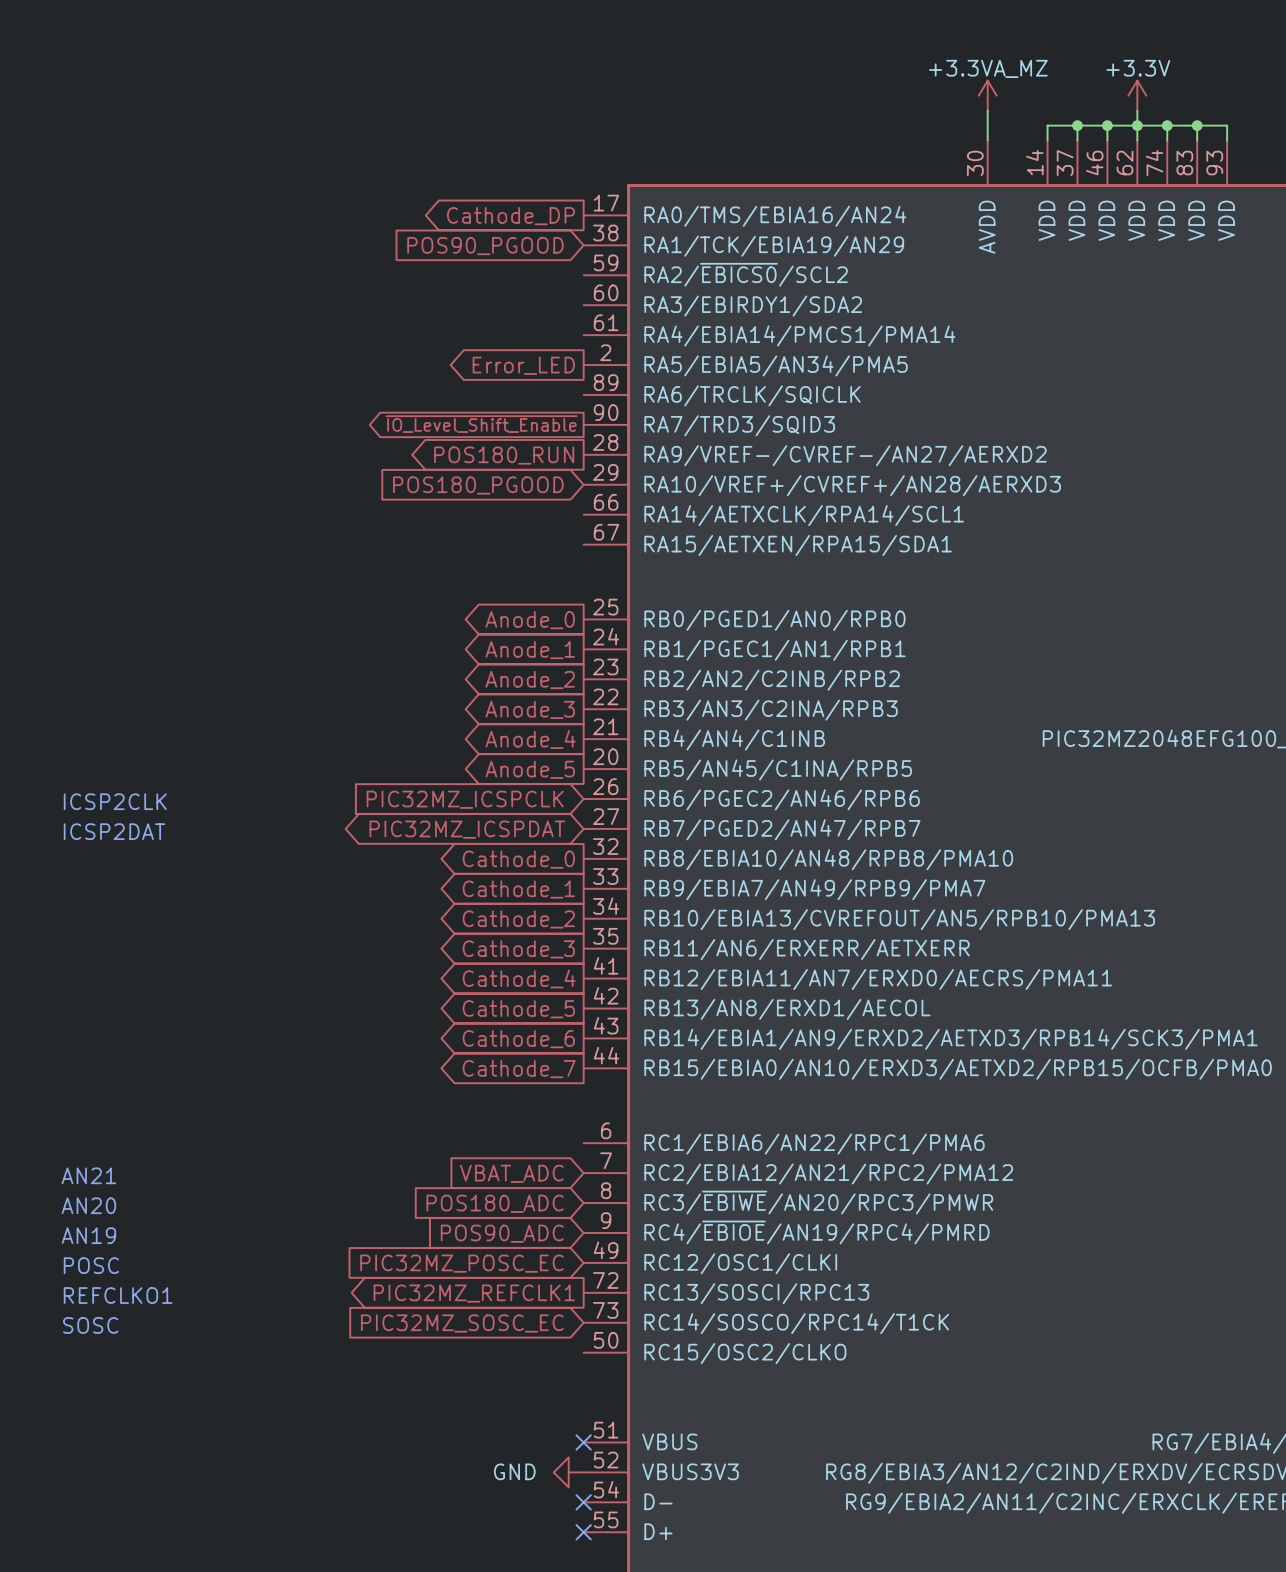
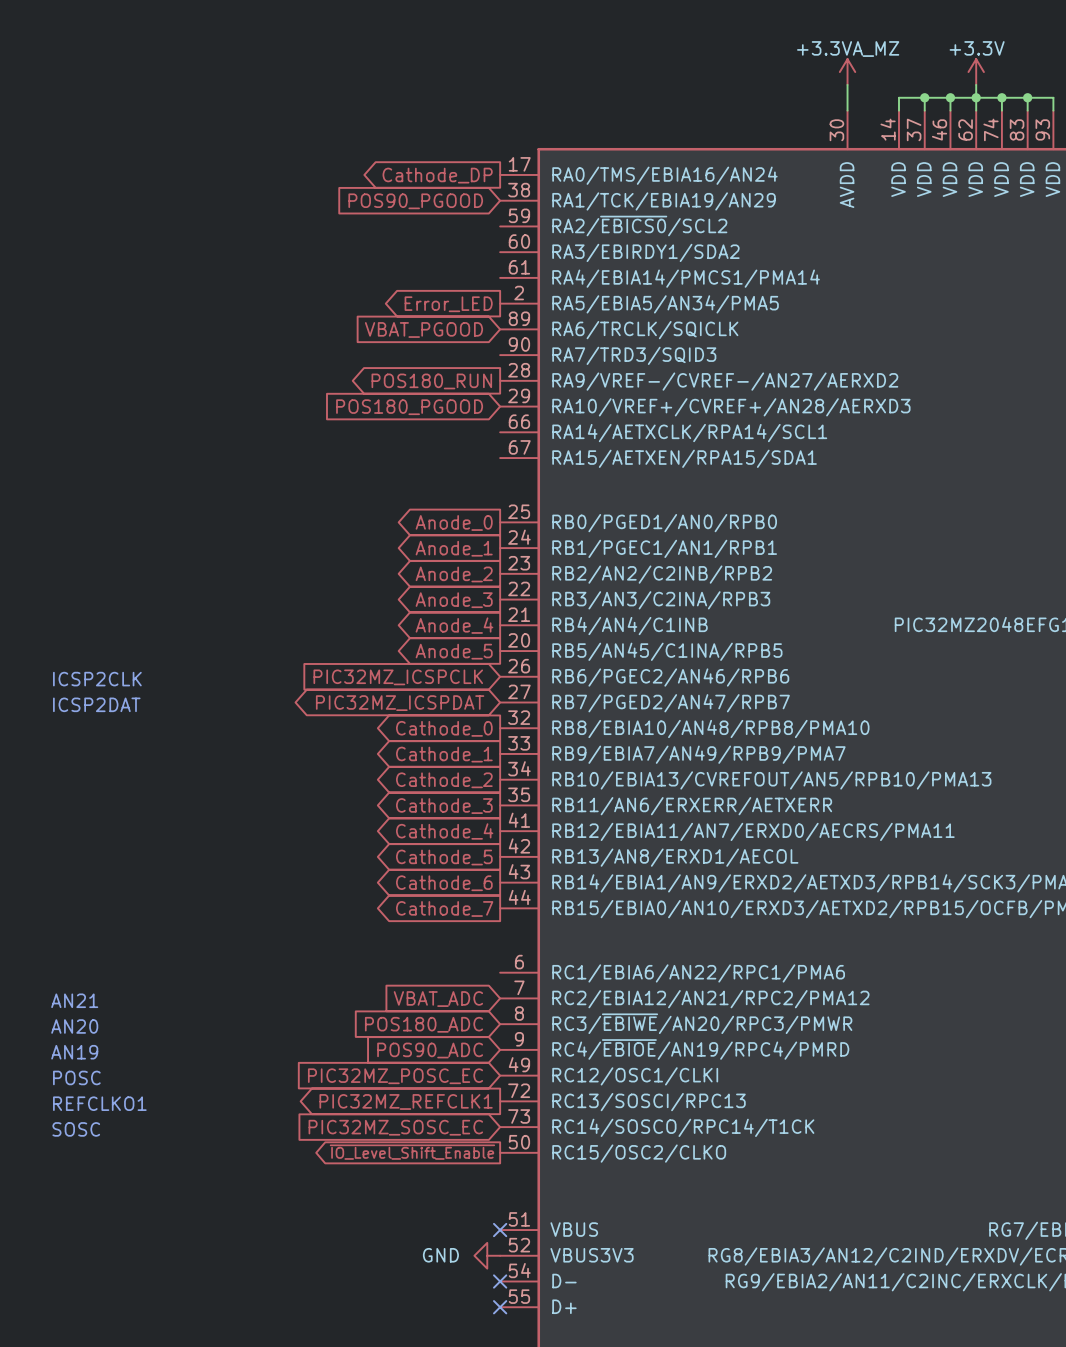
global label: none -> VBAT_PGOOD (423, 329)
global label: ~{IO_Level_Shift_Enable} (481, 424) -> none
global label: none -> ~{IO_Level_Shift_Enable} (412, 1152)

